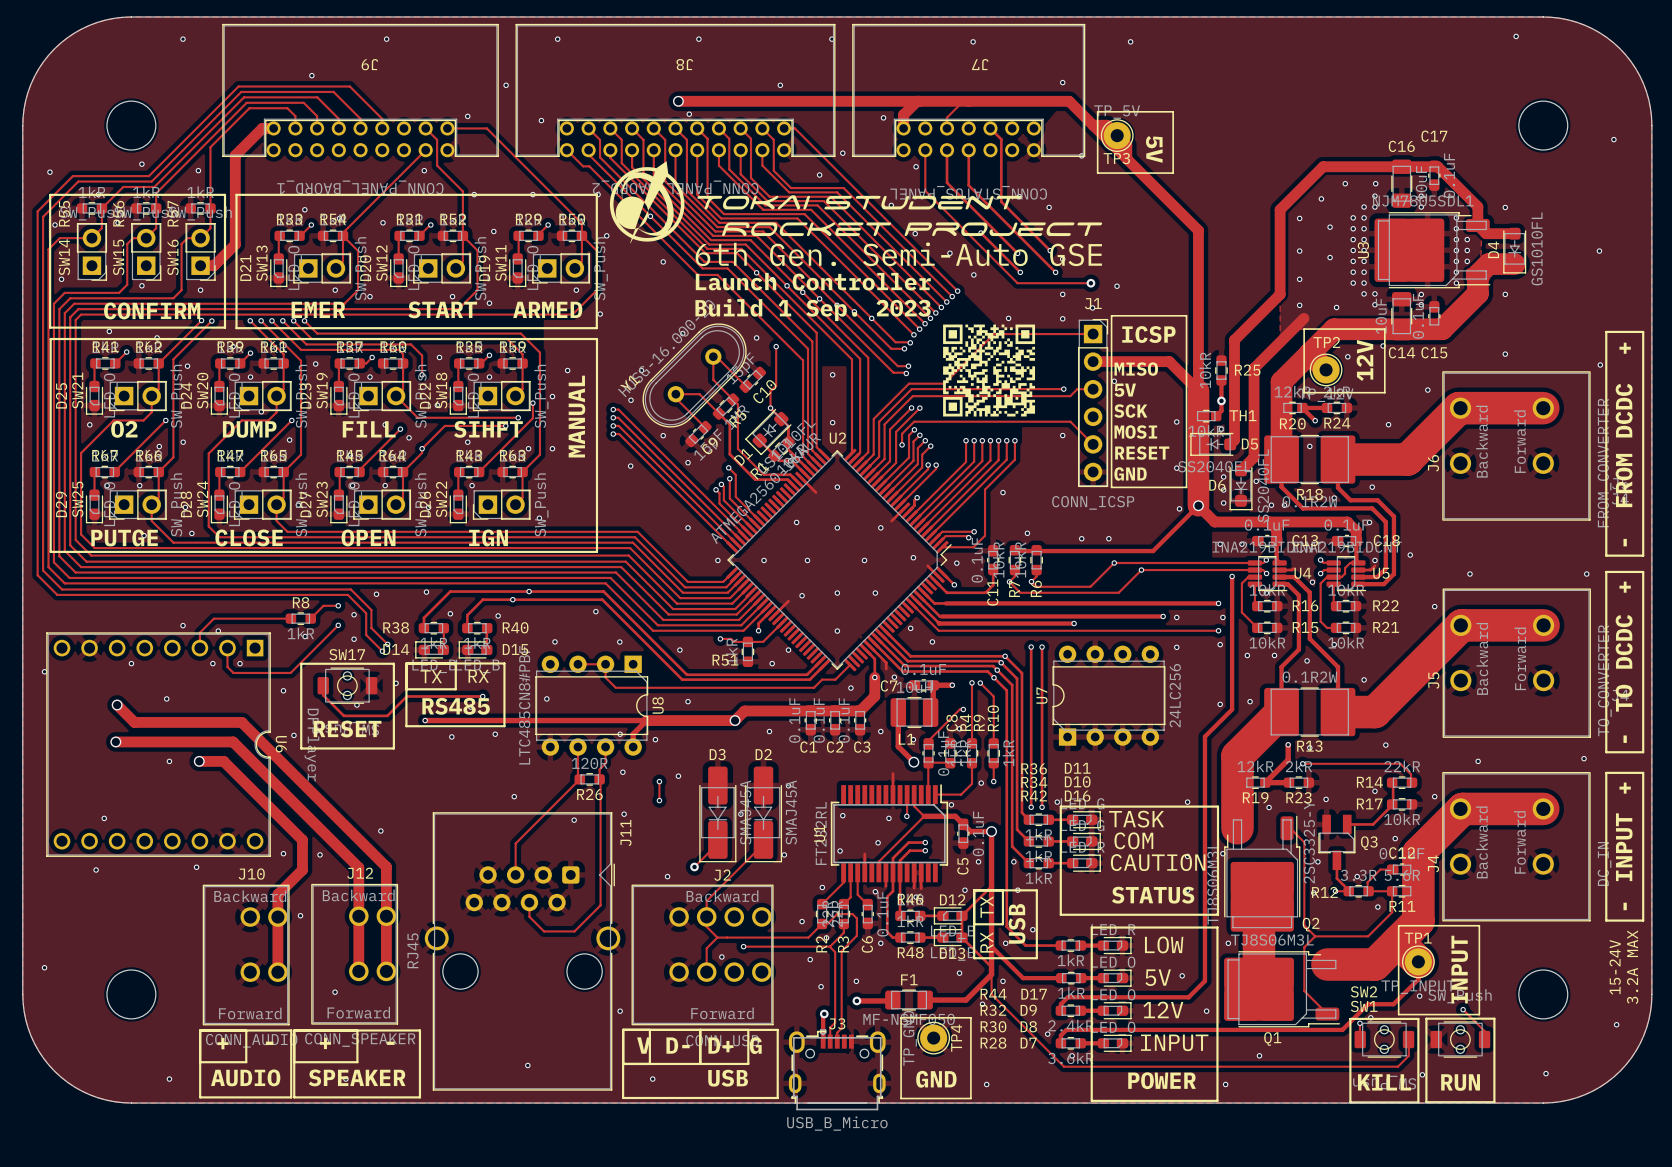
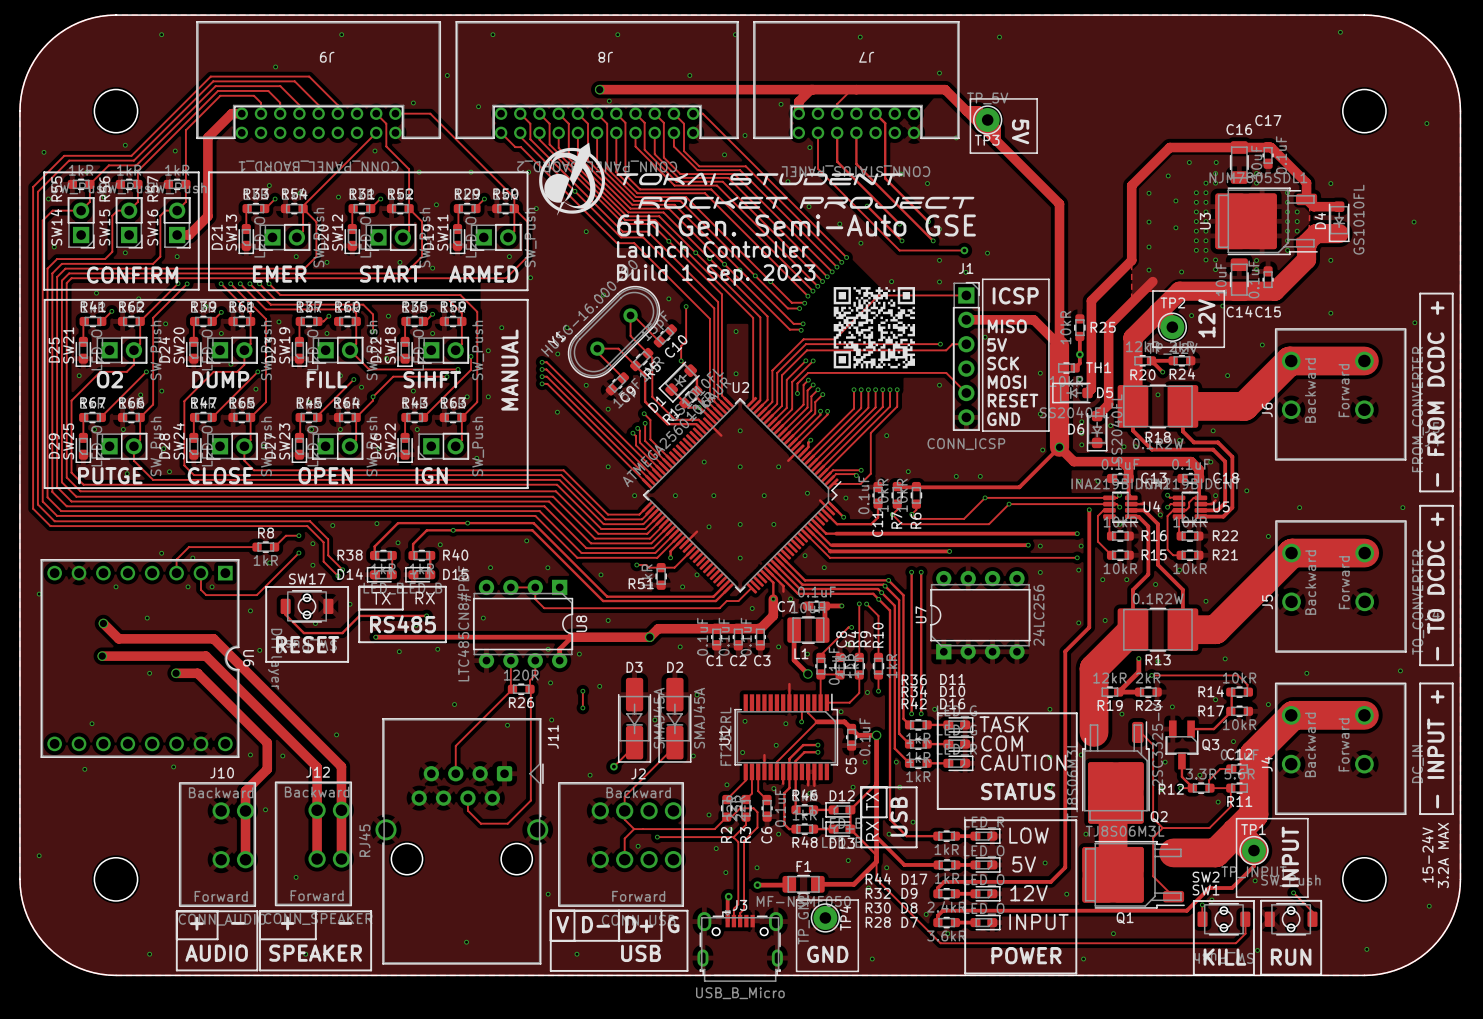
R14 value: 22kR (1402, 766) -> 10kR (1239, 678)

